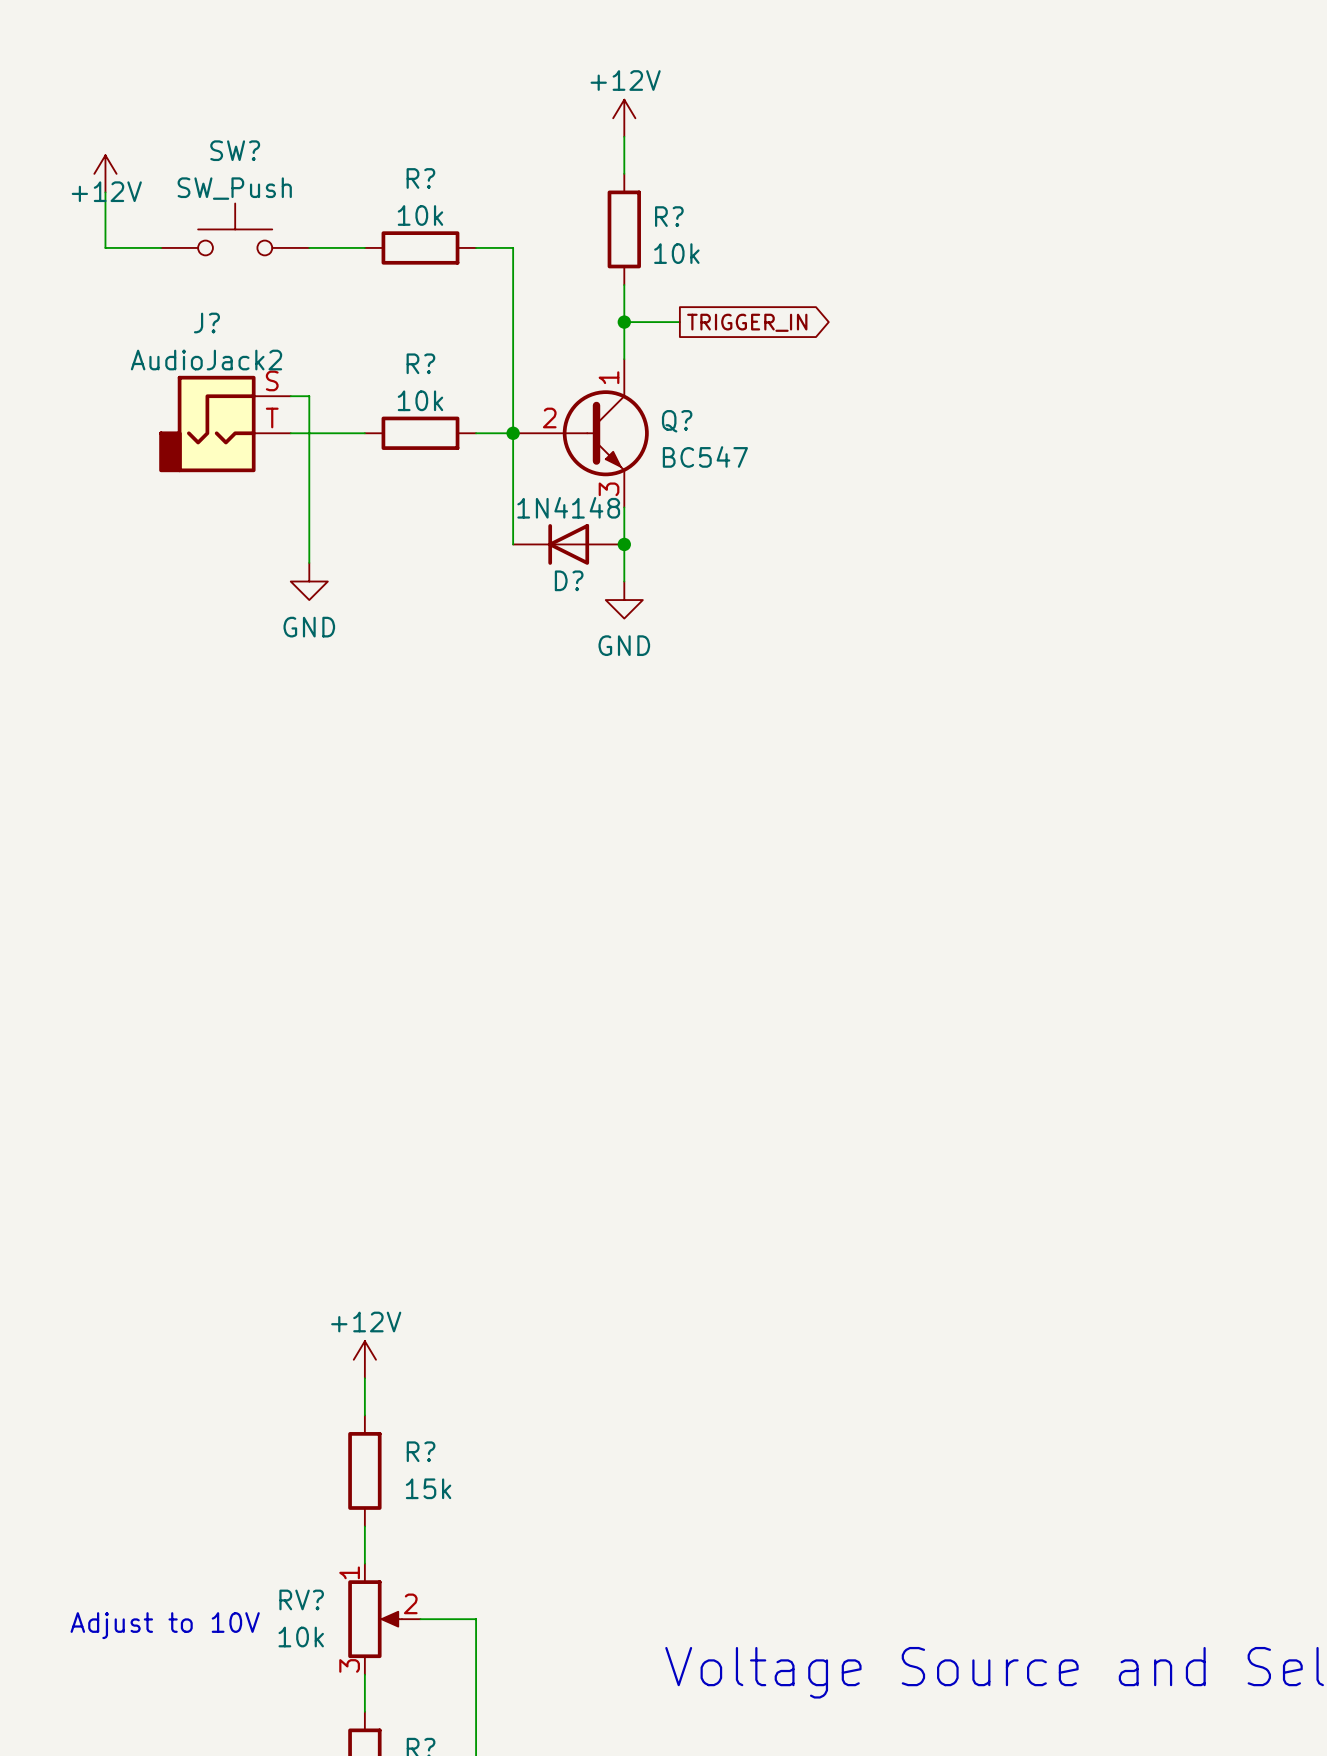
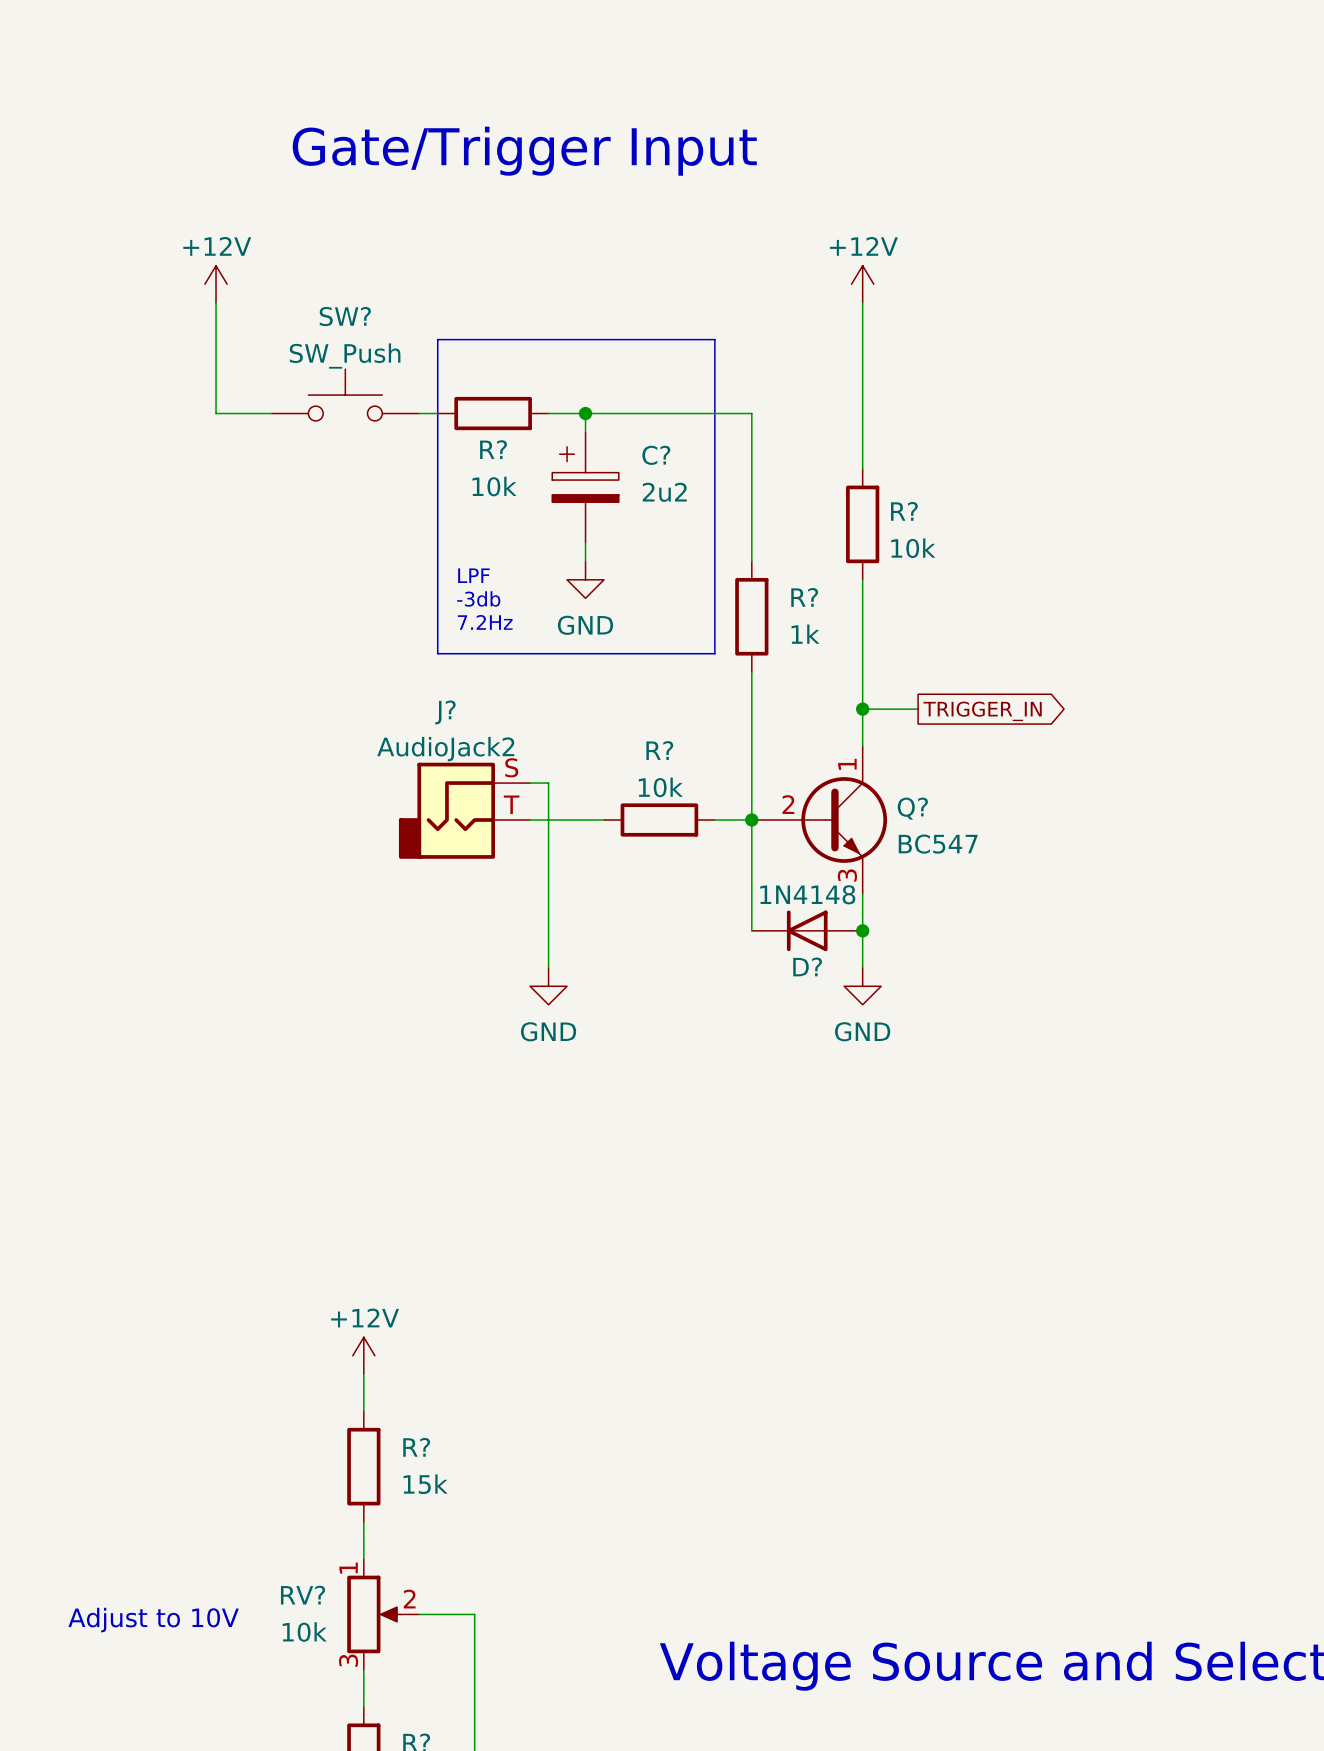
power symbol: +12V (624, 118) -> none
wire: (624, 136) (624, 173) -> none
text: none -> Gate/Trigger Input (524, 151)
power symbol position: +12V (105, 173) -> +12V (216, 284)
power symbol text position: +12V (106, 191) -> +12V (217, 246)
wire: (105, 192) (105, 247) (161, 247) -> none
SW? position: (235, 229) -> (345, 395)
R?: 10k (624, 229) -> none
wire: (309, 247) (364, 247) -> none
R?: 10k (420, 247) -> none
wire: (476, 247) (513, 247) (513, 544) -> none
wire: (624, 285) (624, 359) -> none
power symbol: none -> +12V (862, 284)
wire: none -> (216, 302) (216, 413) (271, 413)
wire: none -> (862, 302) (862, 468)
wire: (624, 322) (679, 322) -> none
junction: (624, 322) -> none
global label: TRIGGER_IN (747, 322) -> none
line: none -> (437, 339) (714, 339) (714, 653) (437, 653) (437, 339)
R? name position: R? (420, 363) -> R? (493, 449)
wire: (290, 396) (309, 396) (309, 562) -> none
R? value position: 10k (420, 400) -> 10k (494, 486)
wire: none -> (419, 413) (437, 413)
wire: none -> (548, 413) (751, 413) (751, 561)
wire: none -> (585, 413) (585, 432)
junction: none -> (585, 413)
J?: AudioJack2 (224, 424) -> none
wire: (290, 433) (364, 433) -> none
R? position: (420, 433) -> (493, 413)
wire: (476, 433) (513, 433) -> none
junction: (513, 433) -> none
Q?: BC547 (580, 433) -> none
C?: none -> 2u2 (585, 487)
wire: (624, 507) (624, 581) -> none
R?: none -> 10k (862, 524)
D?: 1N4148 (568, 544) -> none
junction: (624, 544) -> none
text: none -> LPF (473, 575)
power symbol: GND (309, 581) -> none
wire: none -> (862, 579) (862, 746)
text: none -> -3db (478, 598)
power symbol position: GND (624, 600) -> GND (585, 579)
R?: none -> 1k (751, 616)
text: none -> 7.2Hz (485, 622)
wire: none -> (751, 672) (751, 930)
wire: none -> (862, 709) (918, 709)
junction: none -> (862, 709)
global label: none -> TRIGGER_IN (982, 711)
wire: none -> (530, 783) (548, 783) (548, 967)
J?: none -> AudioJack2 (464, 810)
wire: none -> (530, 820) (604, 820)
R?: none -> 10k (659, 820)
wire: none -> (714, 820) (751, 820)
junction: none -> (751, 820)
Q?: none -> BC547 (819, 820)
wire: none -> (862, 893) (862, 967)
D?: none -> 1N4148 (807, 930)
junction: none -> (862, 930)
power symbol: none -> GND (548, 986)
power symbol: none -> GND (862, 986)

